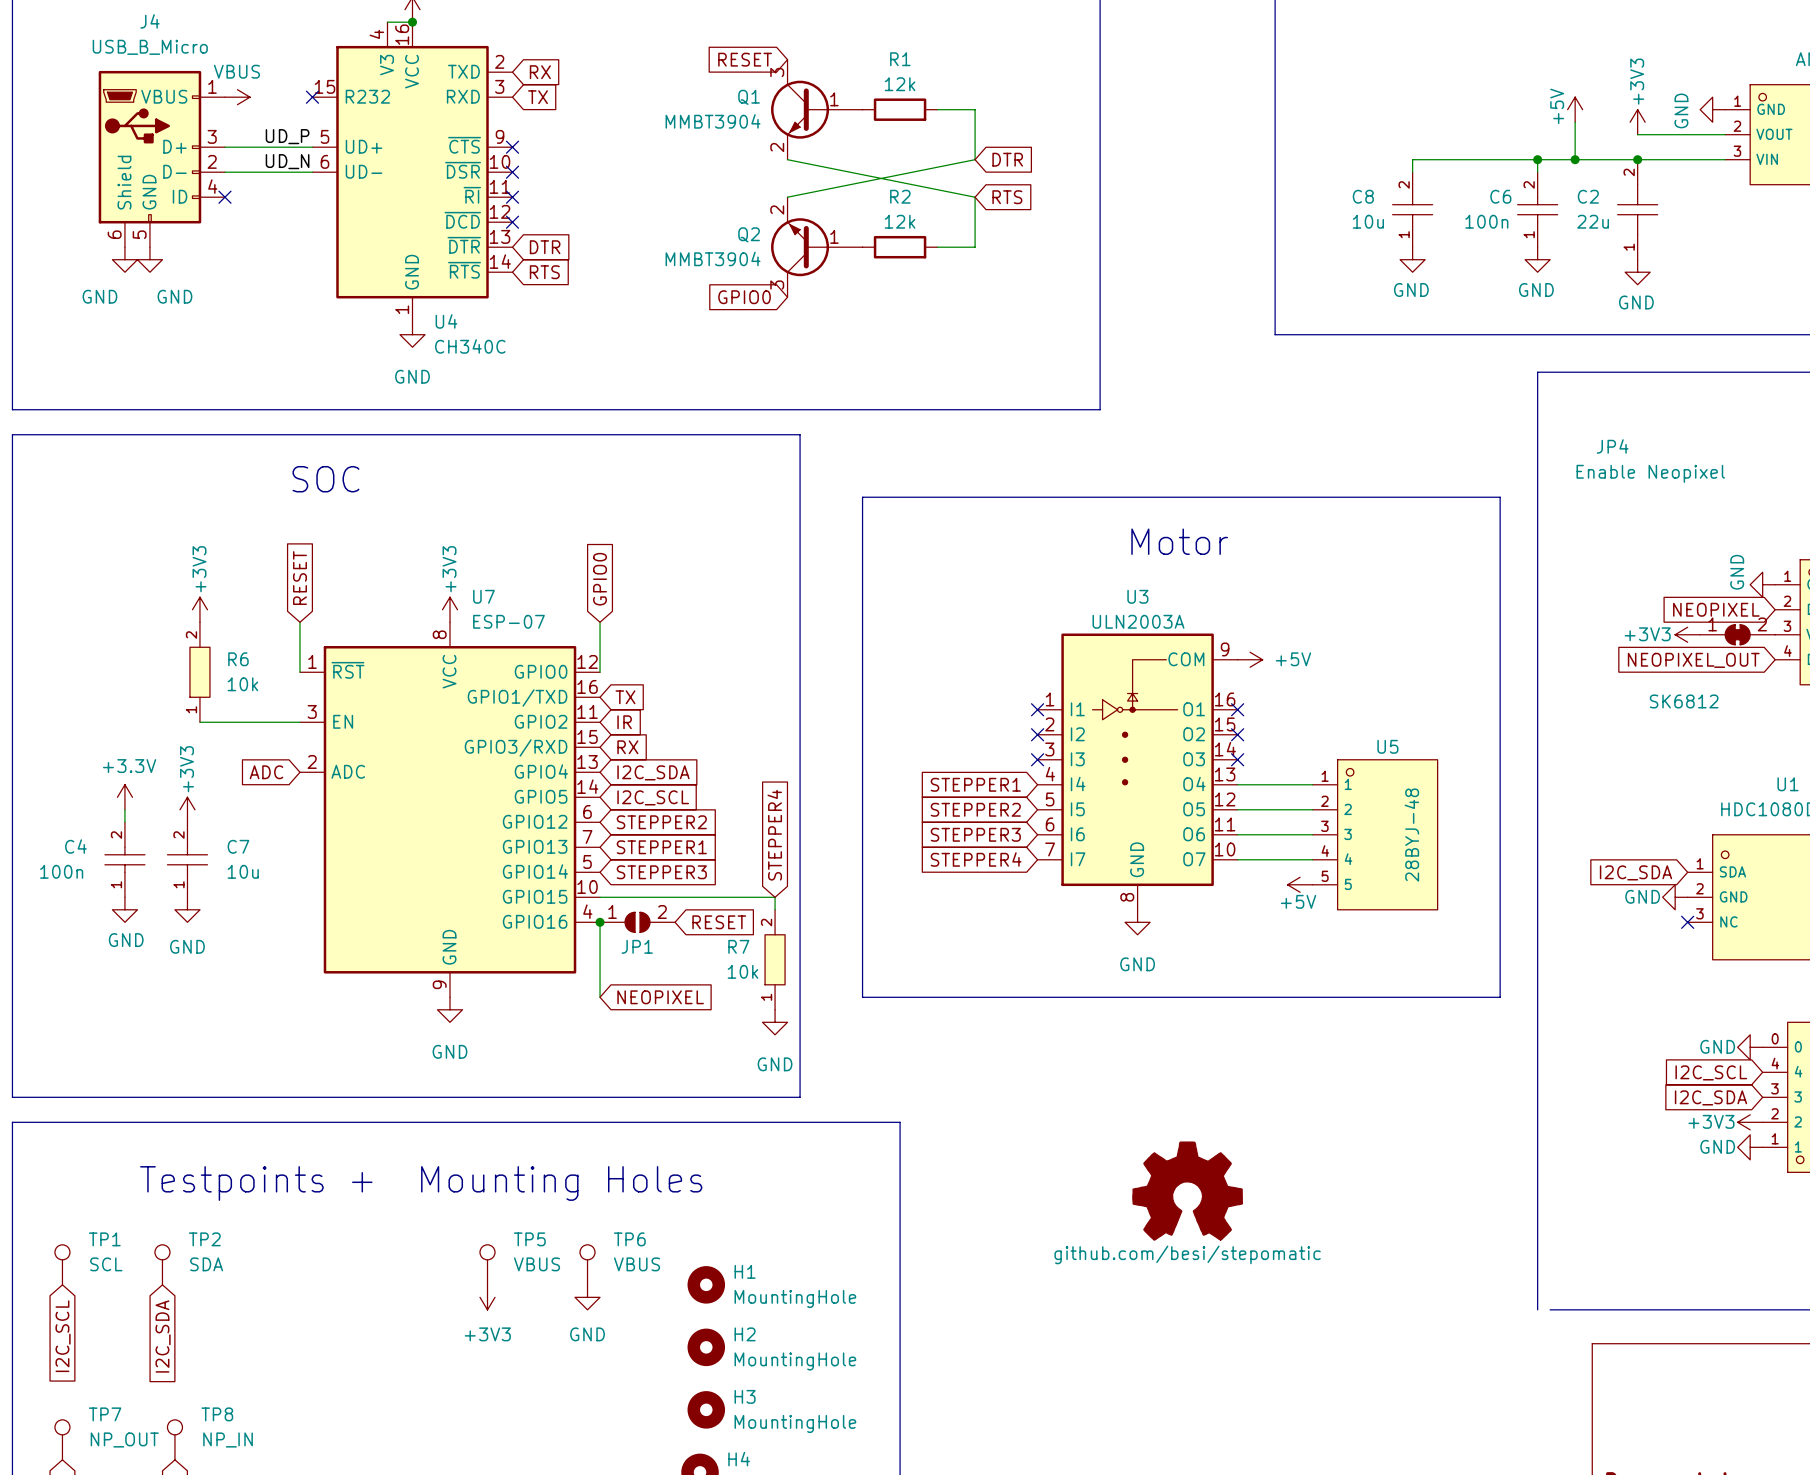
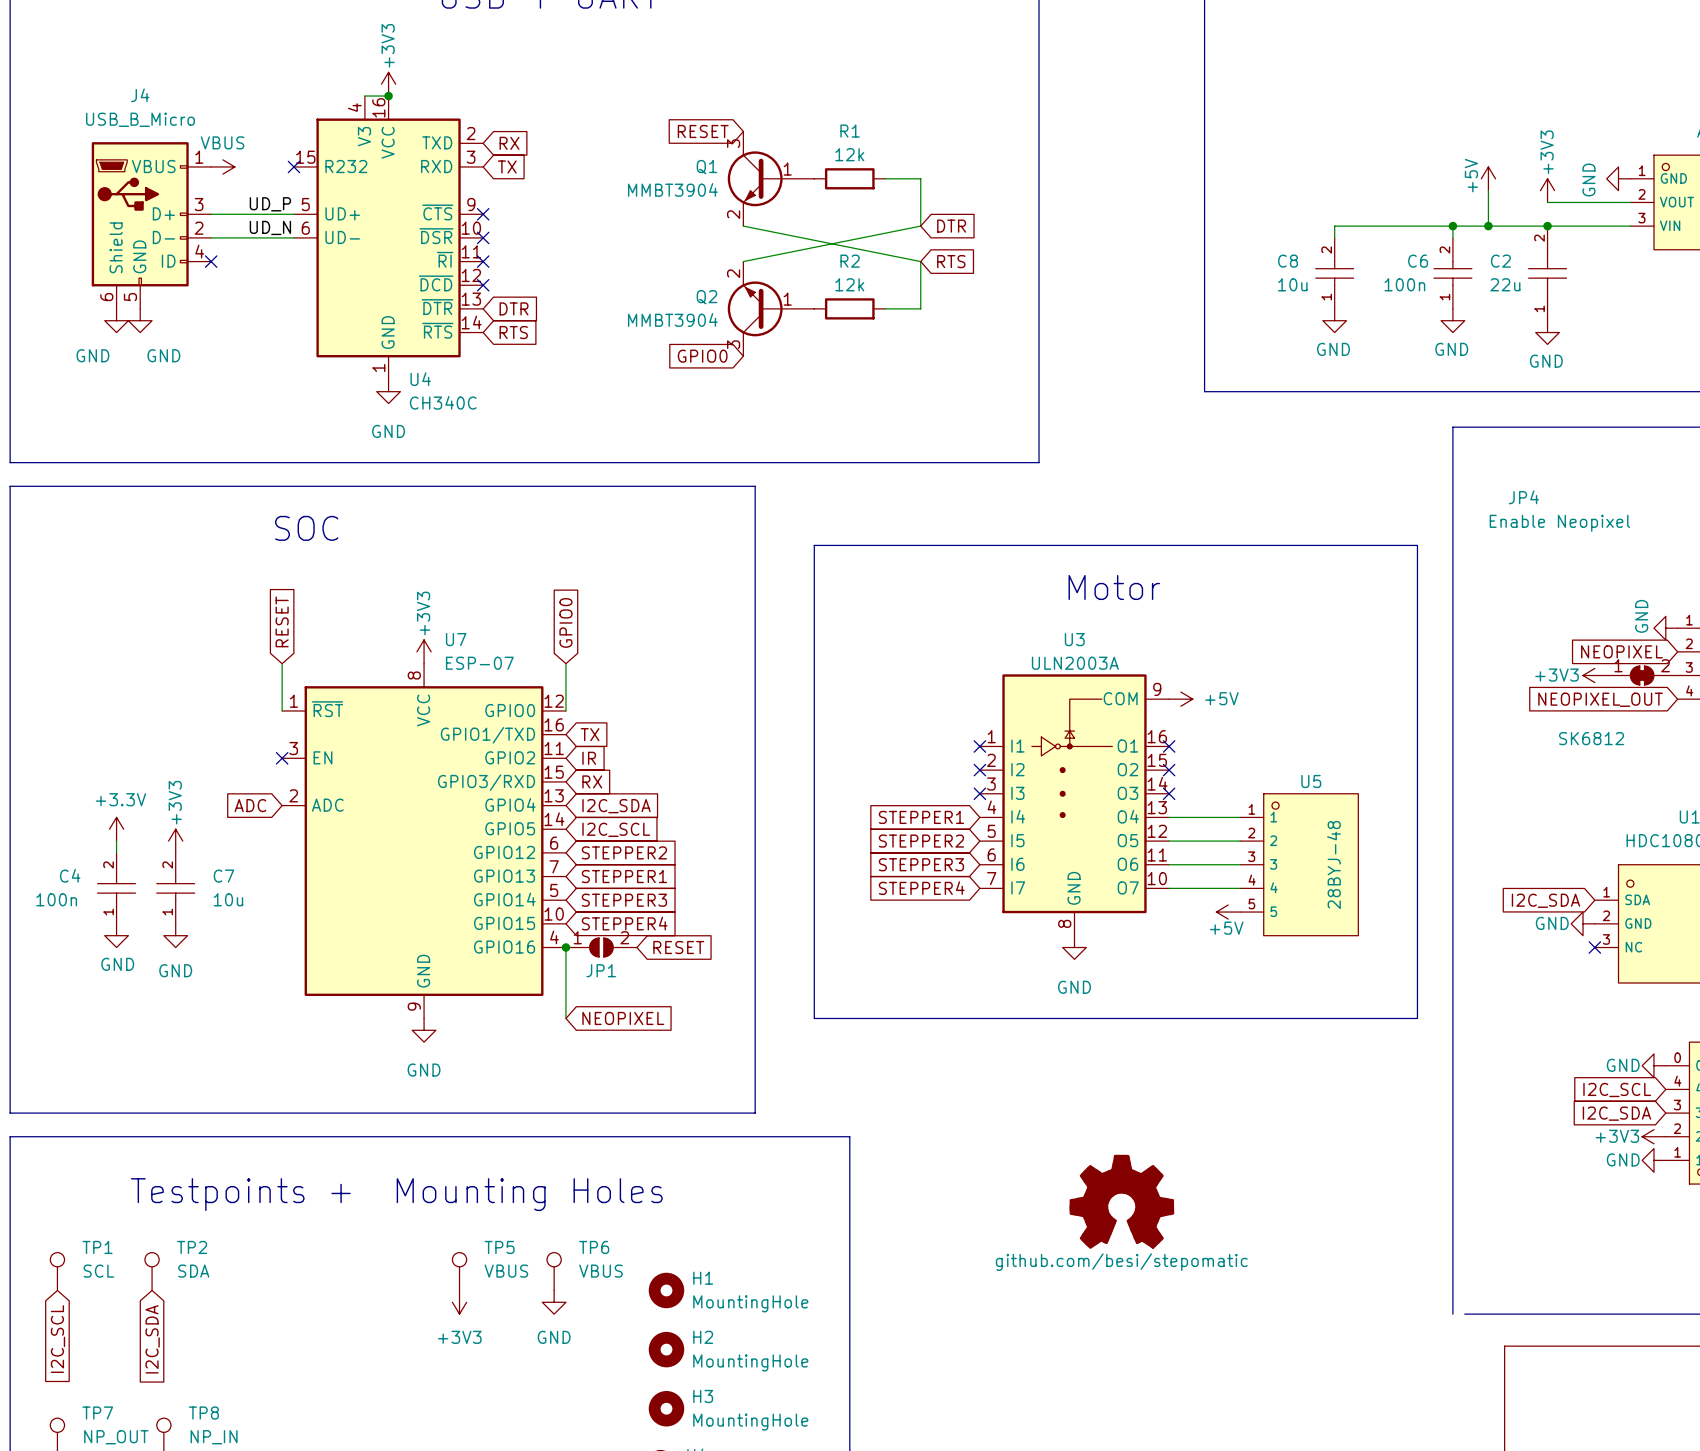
power symbol: +3V3 (199, 609) -> none
R6: 10k (199, 672) -> none
wire: (199, 722) (299, 722) -> none
no-connect mark: none -> (282, 758)
global label rotation: 0° (774, 835) -> 90° clockwise (624, 923)
wire: (600, 897) (775, 897) (775, 909) -> none
R7: 10k (775, 959) -> none
power symbol: GND (775, 1022) -> none

